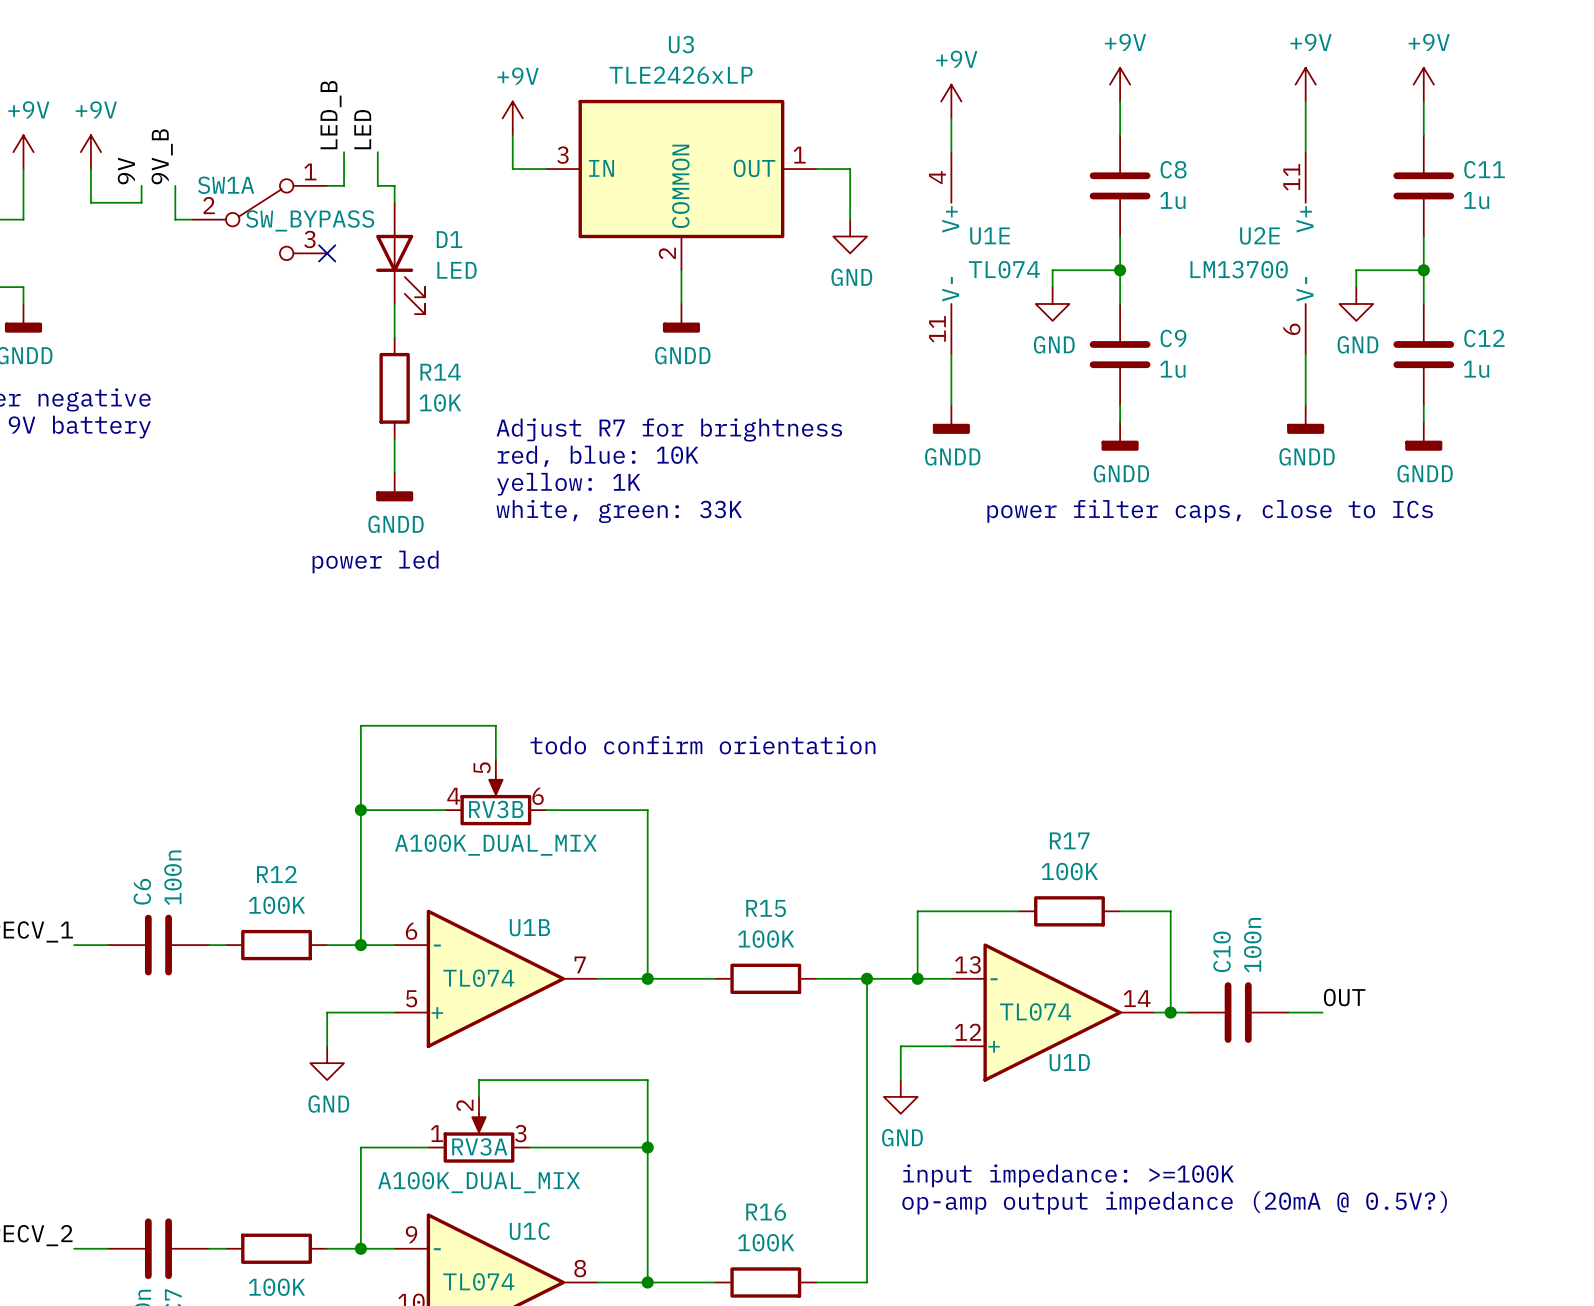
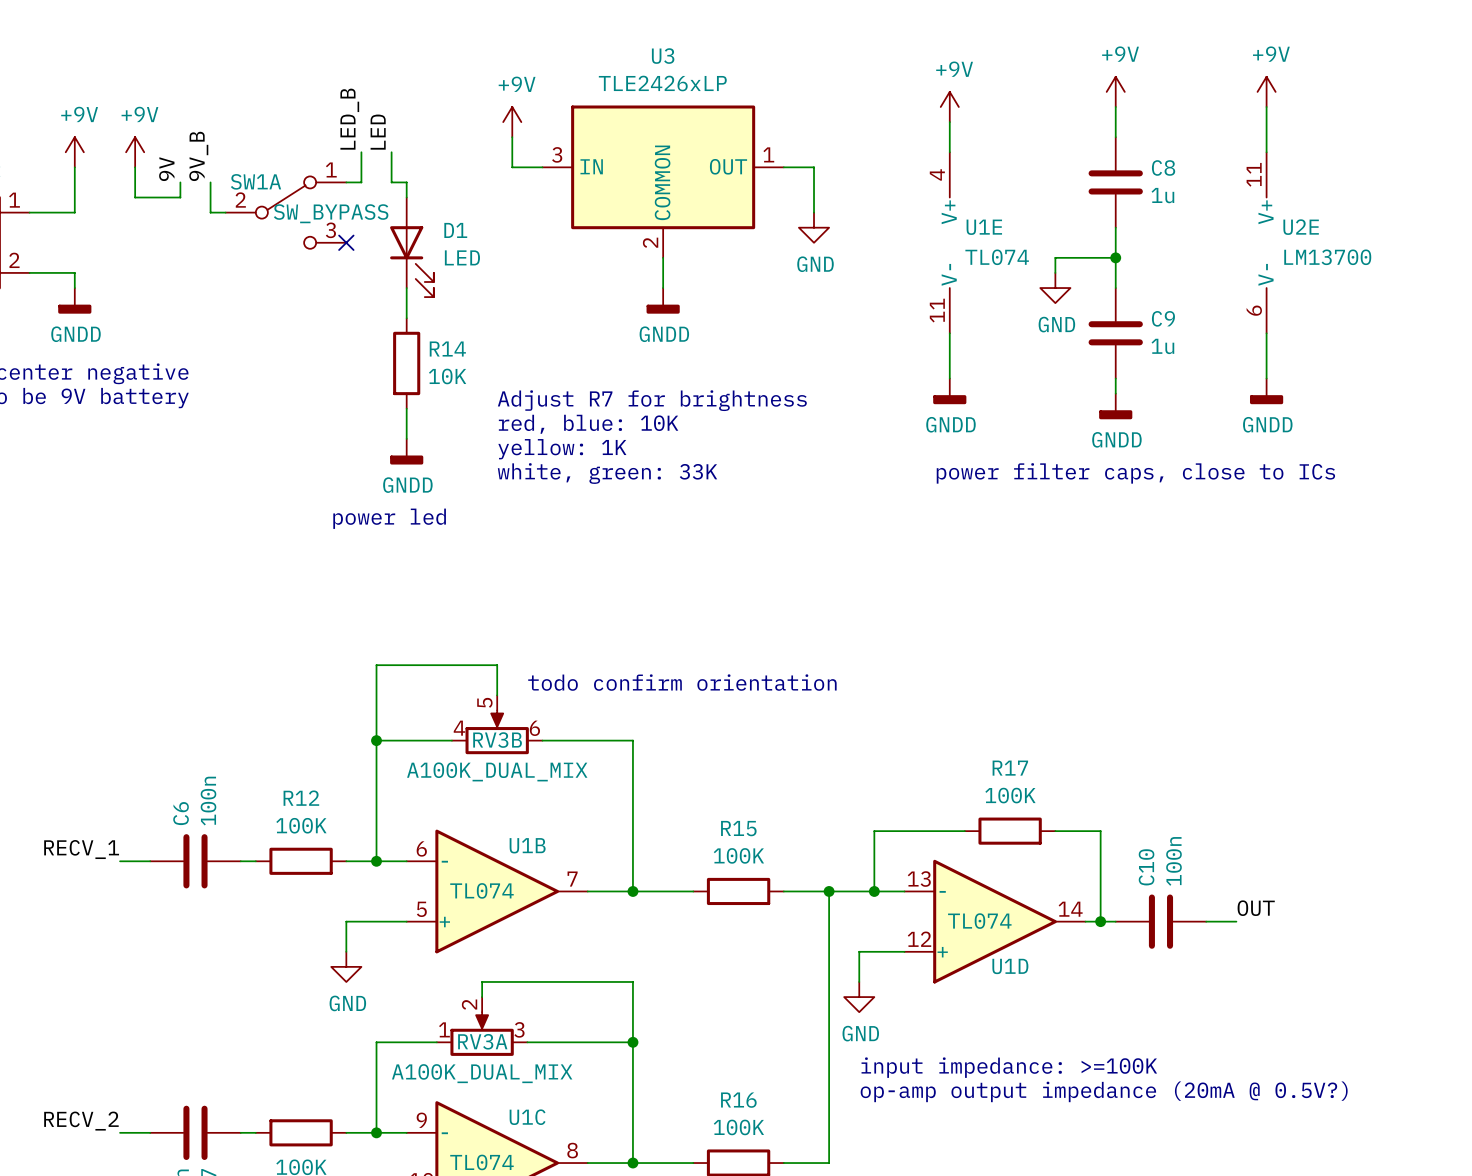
power symbol: +9V (1120, 84) -> none
power symbol: none -> +9V (1115, 91)
power symbol: +9V (1305, 84) -> none
power symbol: none -> +9V (1266, 91)
power symbol: +9V (1423, 84) -> none
power symbol position: +9V (951, 101) -> +9V (949, 107)
wire: (1120, 101) (1120, 135) -> none
wire: (1305, 101) (1305, 152) -> (1266, 107) (1266, 152)
wire: (1423, 101) (1423, 135) -> (1115, 107) (1115, 137)
wire: (951, 118) (951, 152) -> (949, 122) (949, 152)
C8 position: (1120, 185) -> (1115, 182)
C11: 1u (1423, 185) -> none
U2E name position: U2E (1259, 235) -> U2E (1301, 227)
wire: (1120, 236) (1120, 270) (1052, 270) (1052, 287) -> none
wire: (1423, 236) (1423, 303) -> (1115, 227) (1115, 288)
U1E position: (951, 253) -> (949, 242)
U2E position: (1305, 253) -> (1266, 242)
U2E value position: LM13700 (1239, 269) -> LM13700 (1327, 257)
wire: none -> (1055, 257) (1115, 257)
junction position: (1120, 270) -> (1115, 257)
wire: (1423, 270) (1356, 270) (1356, 287) -> none
junction: (1423, 270) -> none
power symbol position: GND (1052, 303) -> GND (1055, 288)
power symbol: GND (1356, 303) -> none
wire: (951, 354) (951, 405) -> (949, 333) (949, 378)
C9 position: (1120, 354) -> (1115, 333)
wire: (1305, 354) (1305, 405) -> (1266, 333) (1266, 378)
C12: 1u (1423, 354) -> none
wire: (1120, 405) (1120, 422) -> none
wire: (1423, 405) (1423, 422) -> (1115, 378) (1115, 393)
power symbol position: GNDD (951, 419) -> GNDD (949, 391)
power symbol: GNDD (1305, 419) -> none
power symbol: none -> GNDD (1266, 391)
power symbol: GNDD (1120, 436) -> none
power symbol: none -> GNDD (1115, 406)
power symbol: GNDD (1423, 436) -> none

